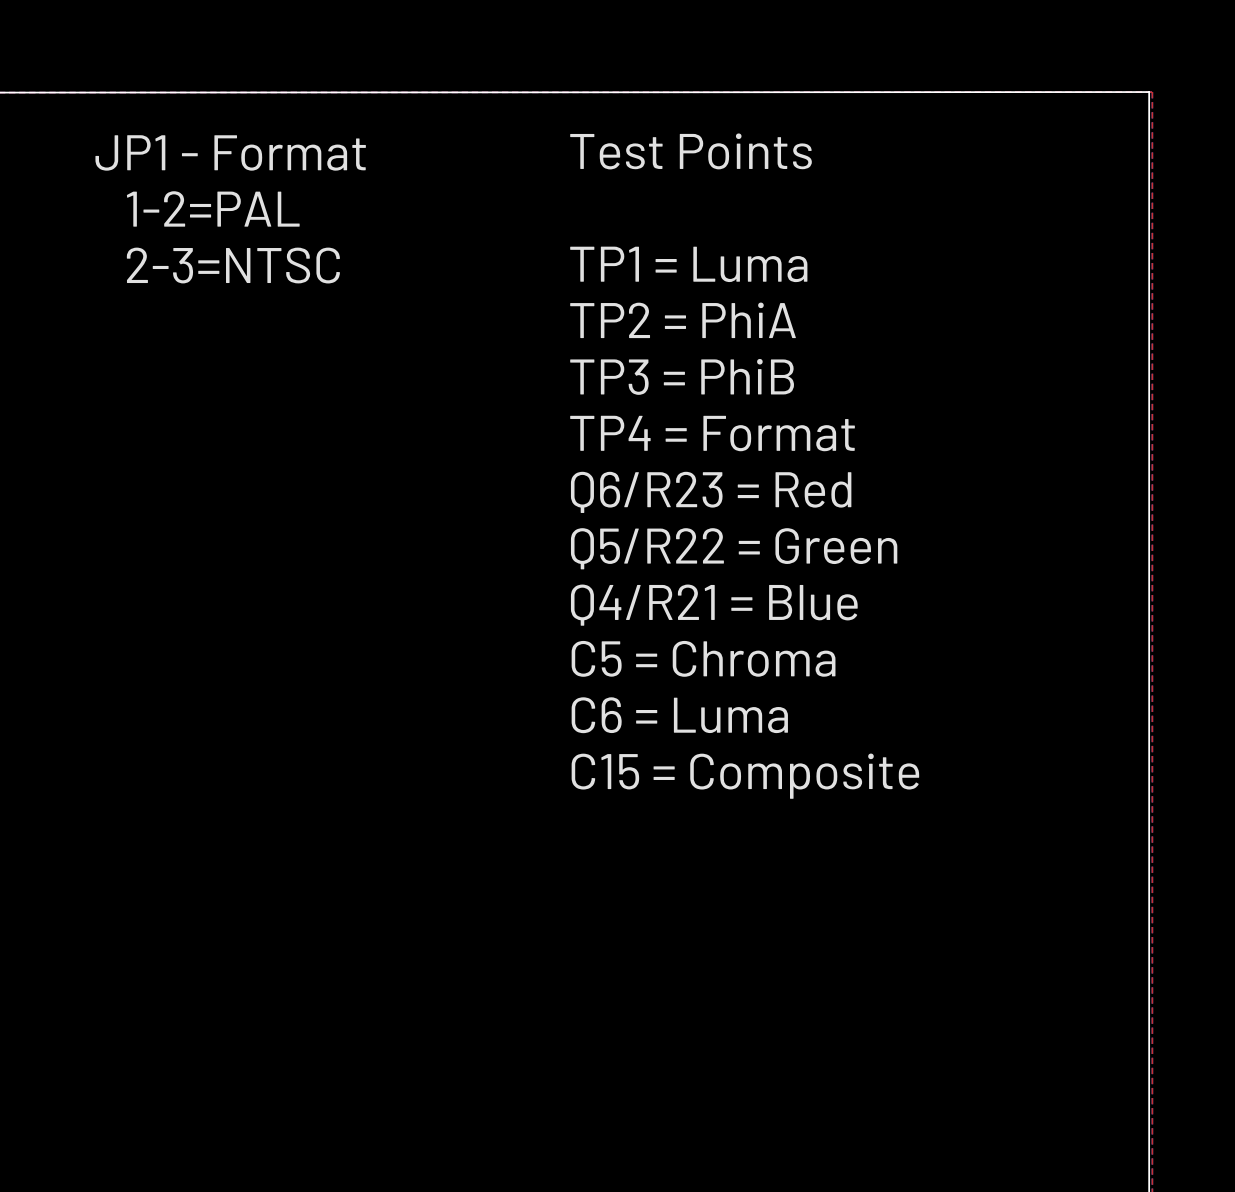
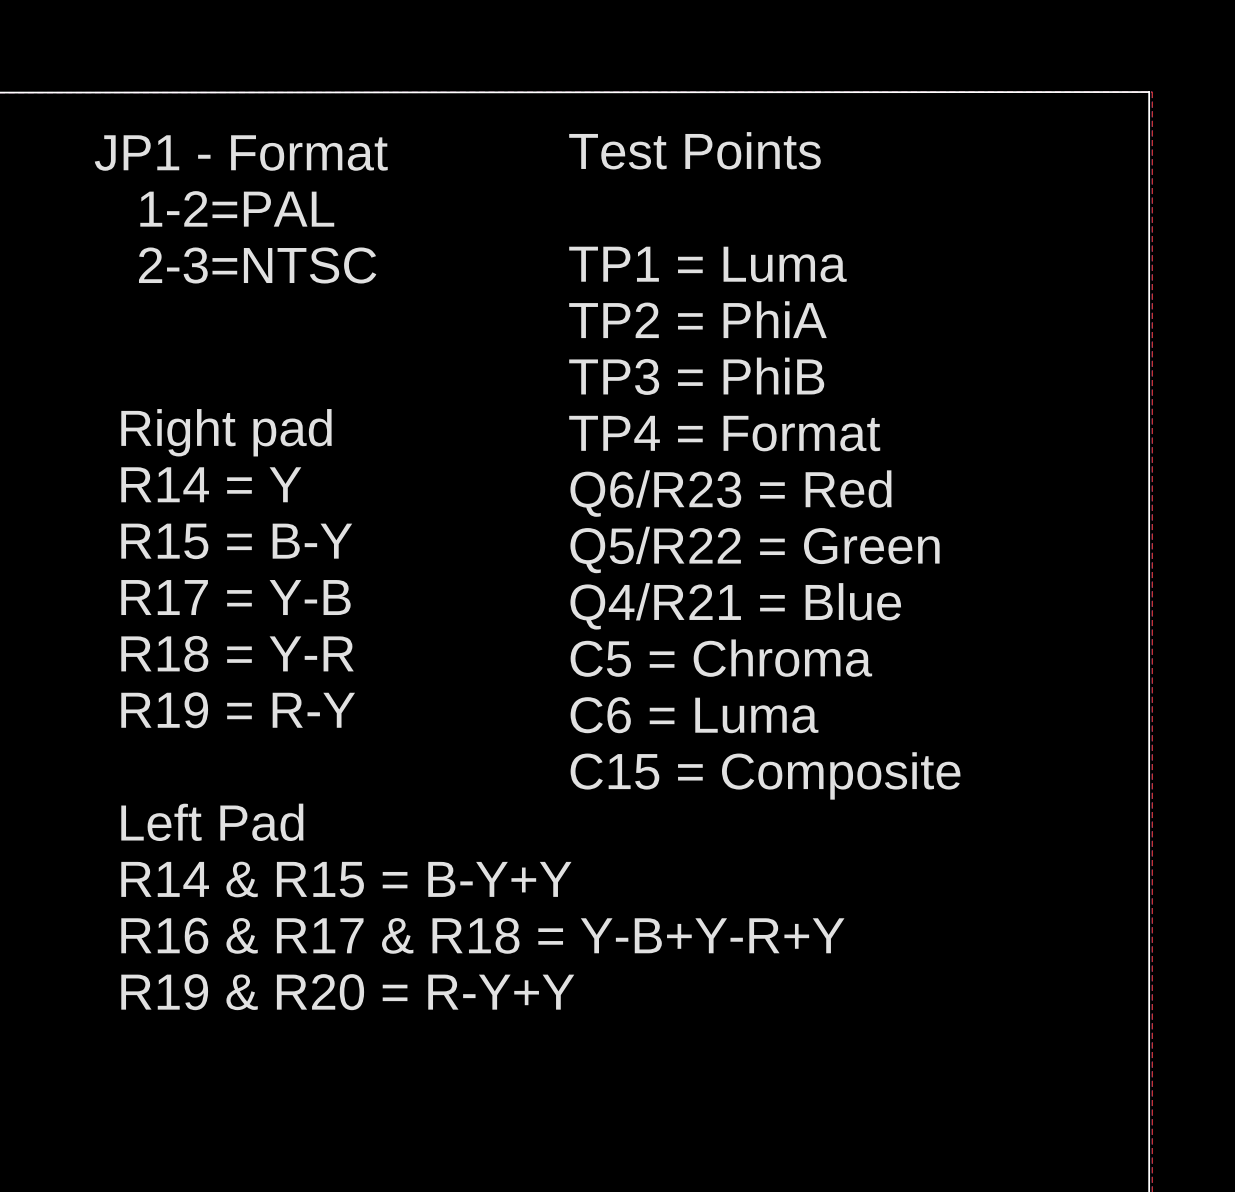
text: none -> Right pad (226, 432)
text: none -> R14 = Y (211, 484)
text: none -> R15 = B-Y (236, 541)
text: none -> R17 = Y-B (235, 597)
text: none -> R18 = Y-R (237, 653)
text: none -> R19 = R-Y (238, 710)
text: none -> Left Pad (212, 822)
text: none -> R14 & R15 = B-Y+Y (346, 879)
text: none -> R16 & R17 & R18 = Y-B+Y-R+Y (482, 935)
text: none -> R19 & R20 = R-Y+Y (347, 992)

